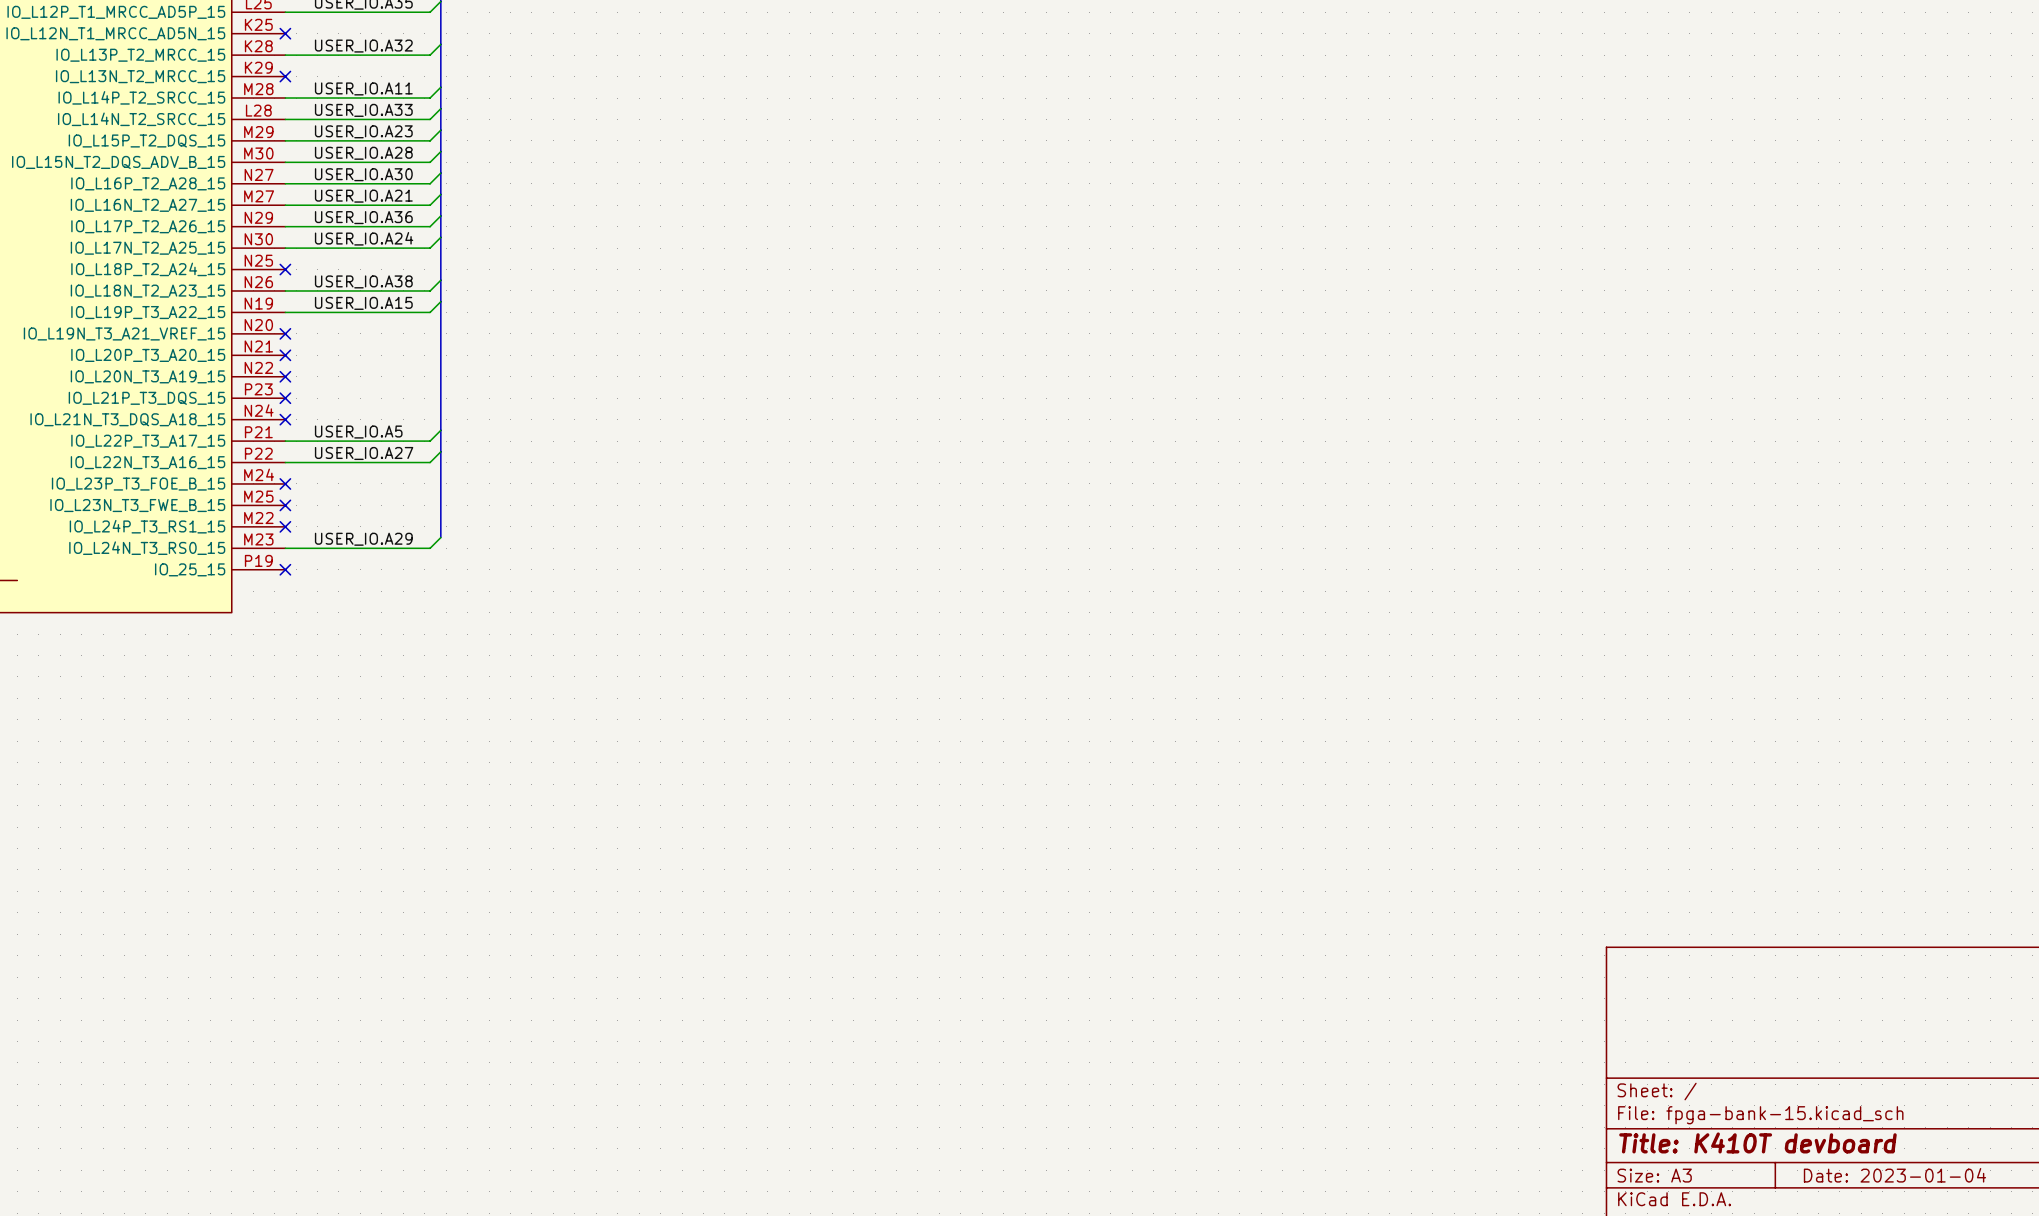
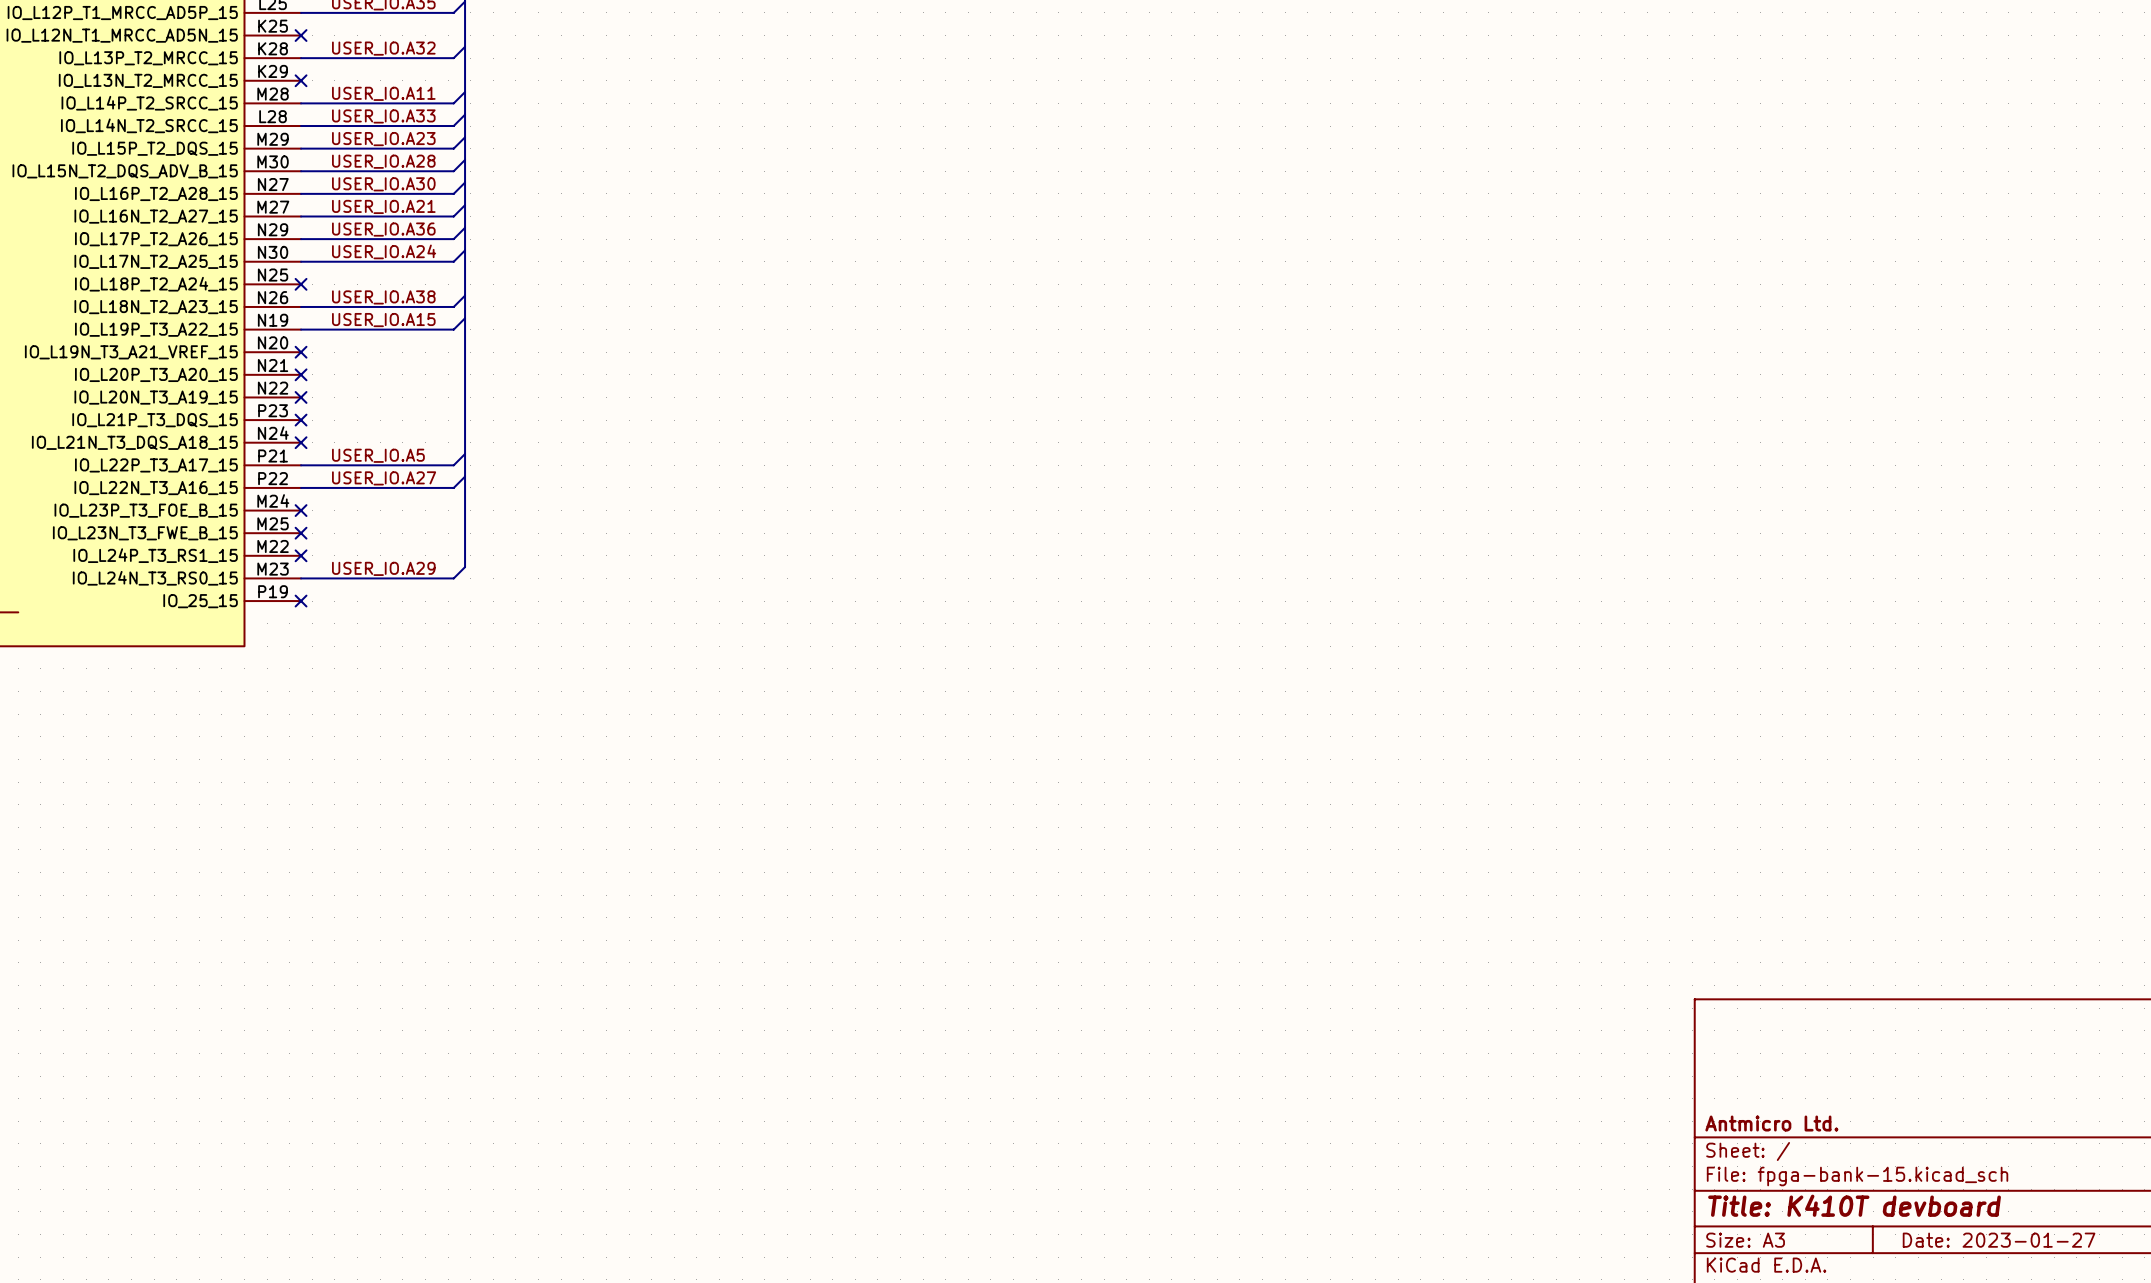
title block: none -> Antmicro Ltd. (1771, 1123)
title block: Date: 2023-01-04 (1894, 1175) -> Date: 2023-01-27 (1999, 1240)

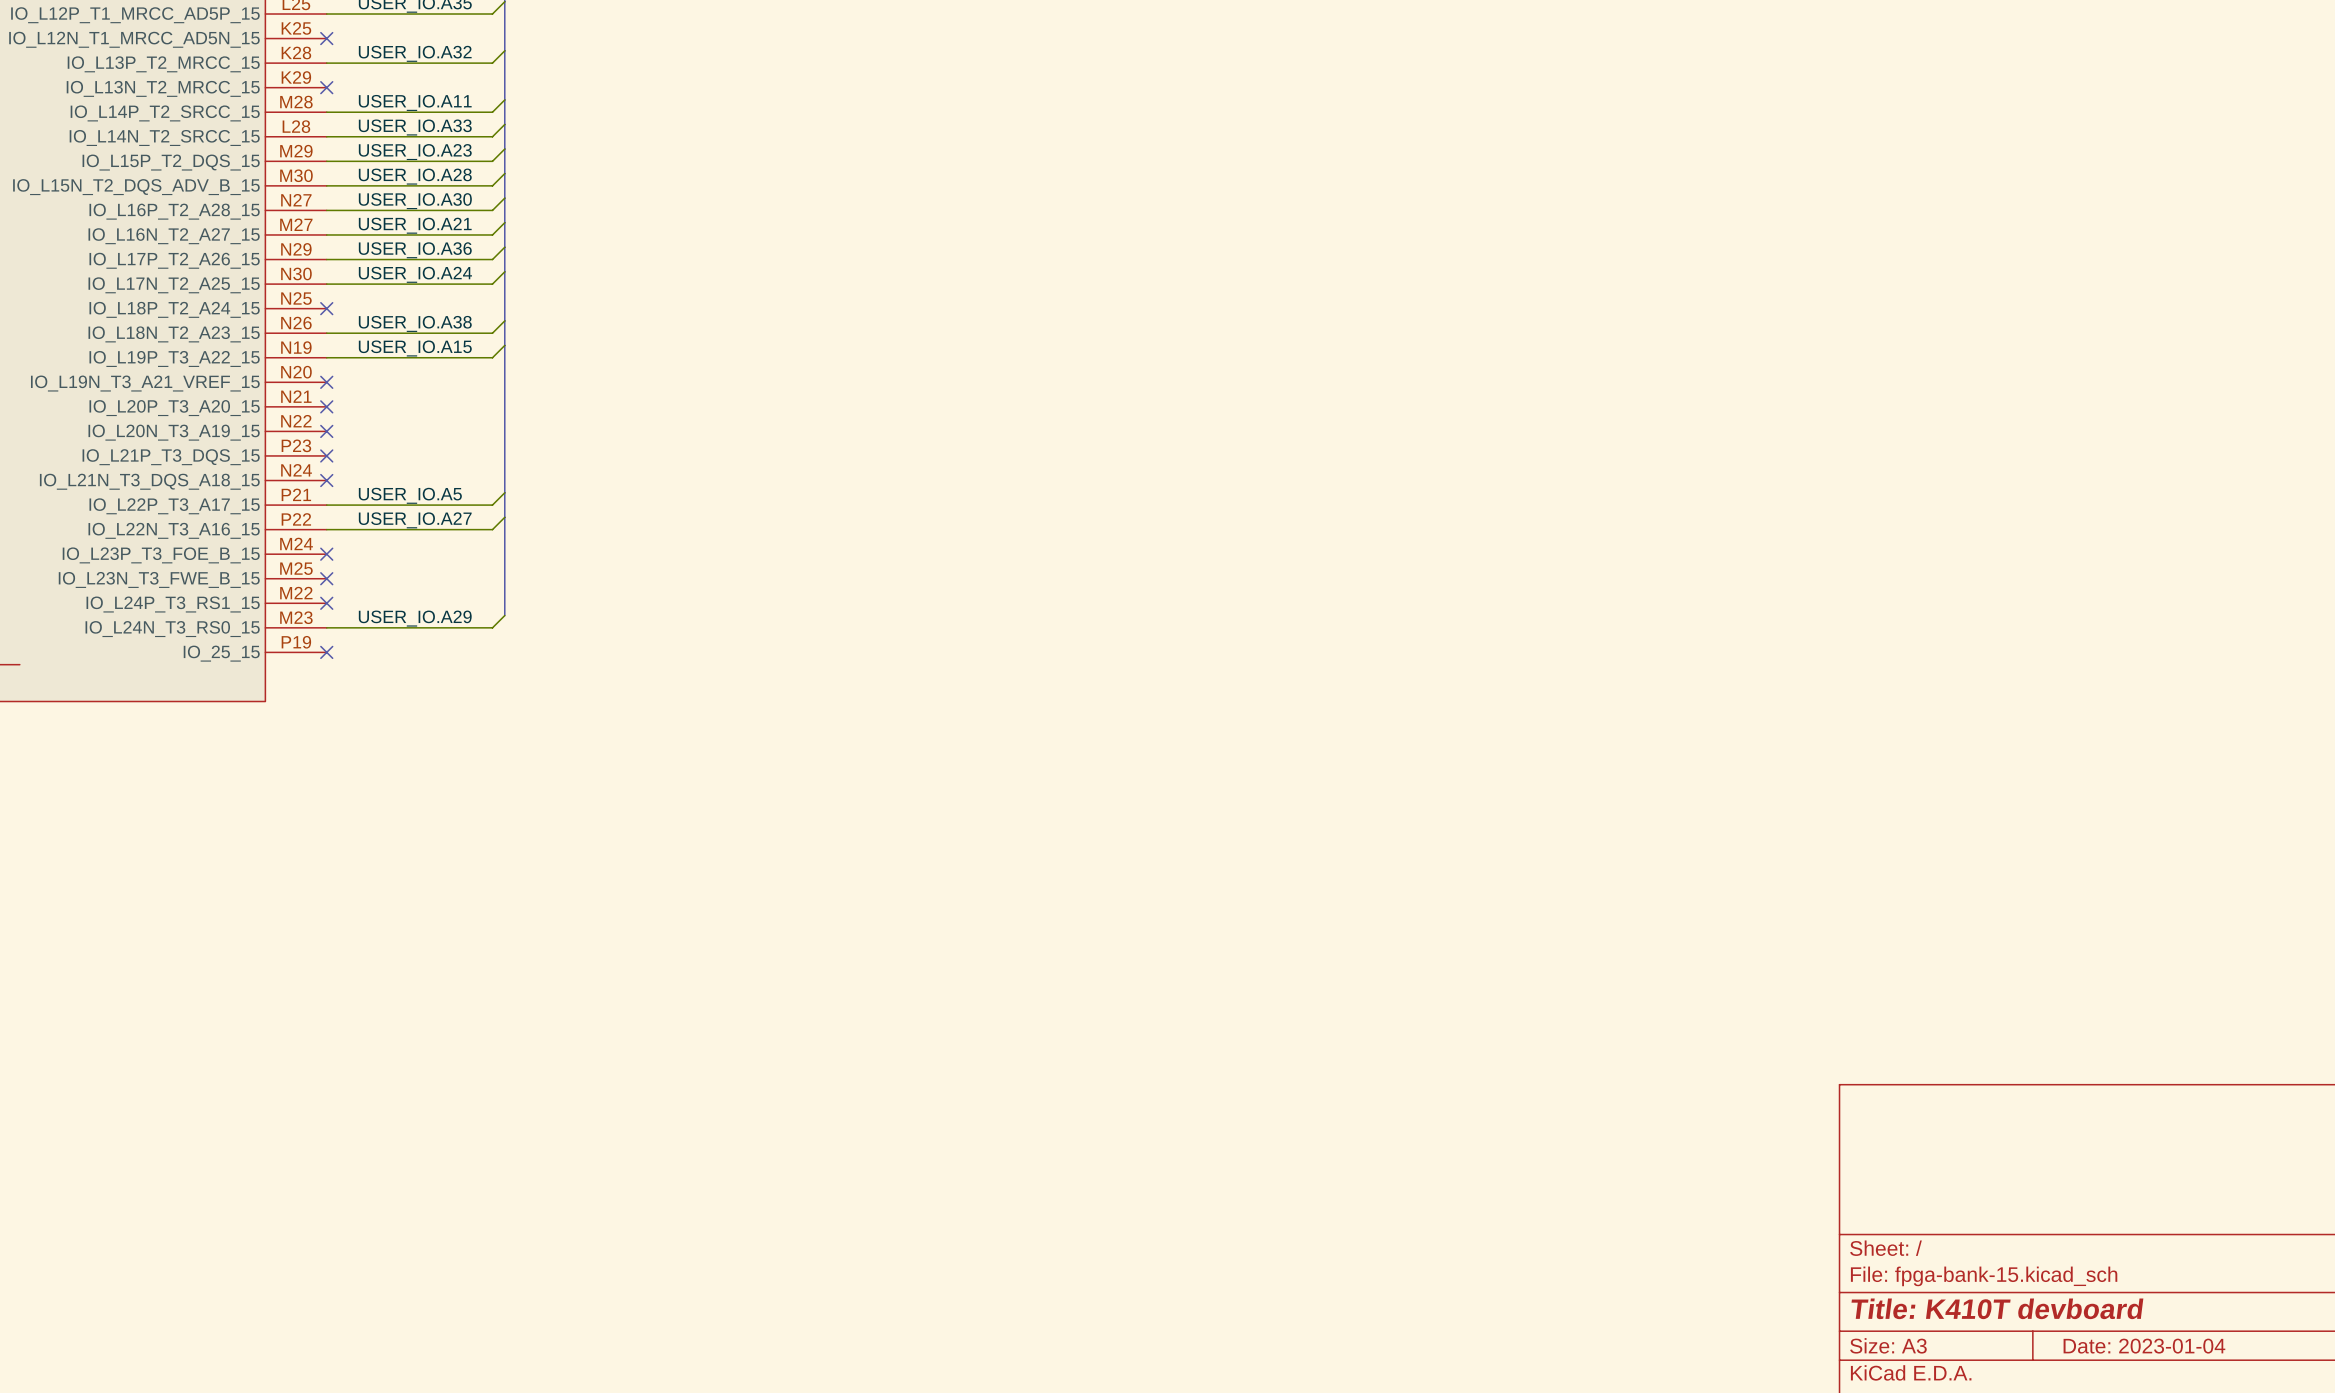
title block: Antmicro Ltd. (1771, 1123) -> none
title block: Date: 2023-01-27 (1999, 1240) -> Date: 2023-01-04 (2144, 1346)

